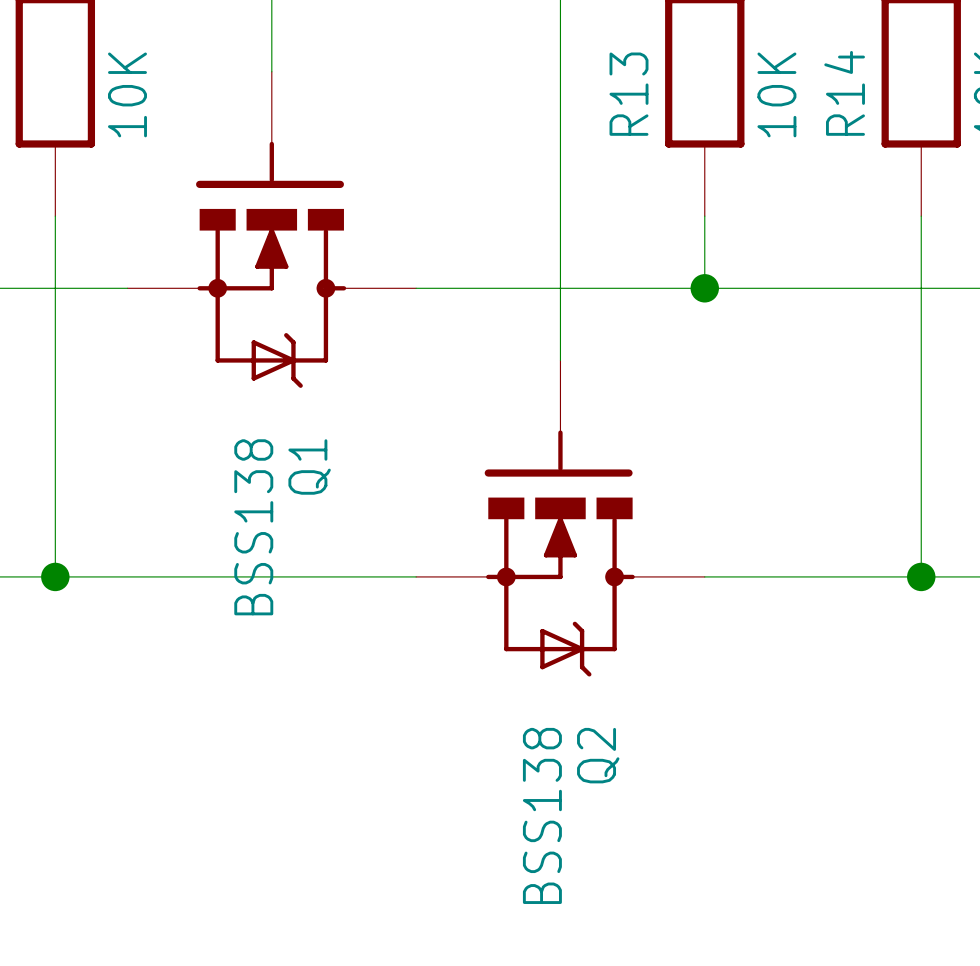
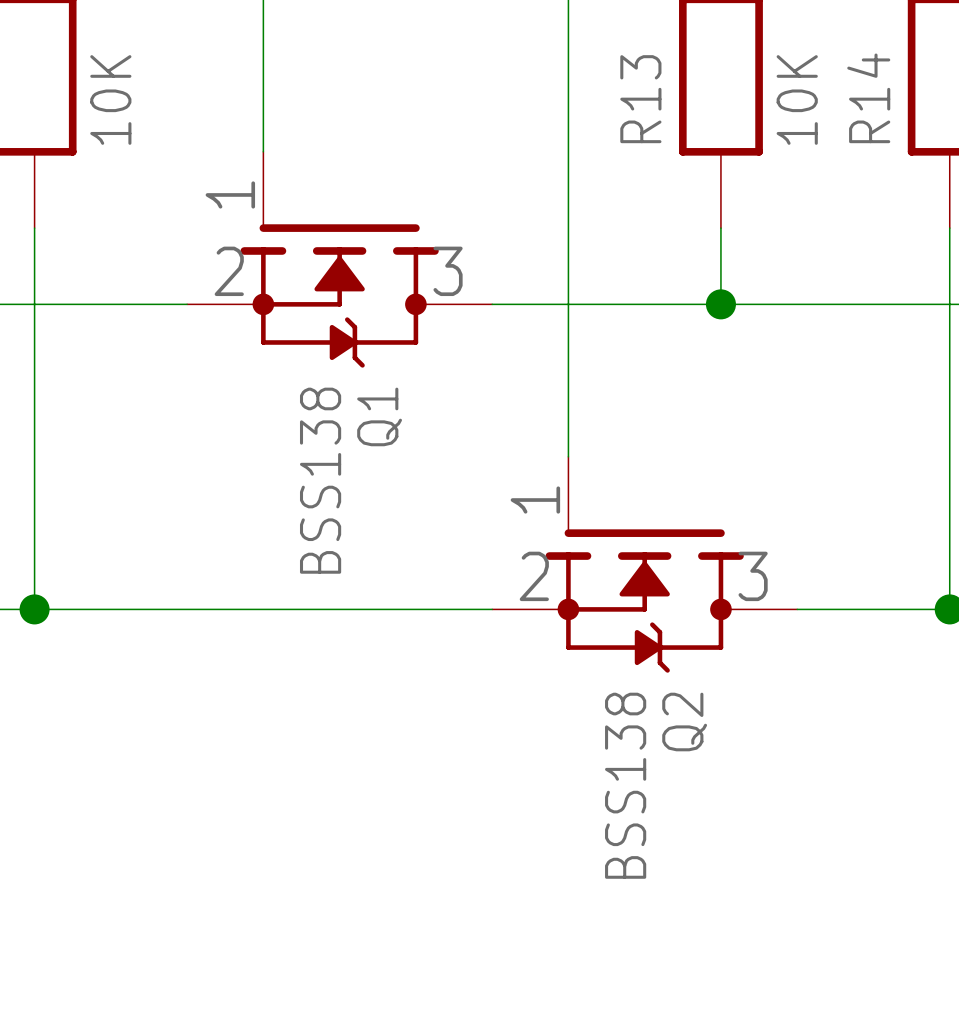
Q1 symbol: [127, 71, 417, 388] -> [187, 151, 493, 368]
Q2 symbol: [416, 360, 705, 677] -> [492, 456, 798, 673]
Q1 name position: Q1 (309, 466) -> Q1 (379, 416)
Q1 value position: BSS138 (253, 527) -> BSS138 (320, 480)
Q2 name position: Q2 (598, 755) -> Q2 (684, 722)
Q2 value position: BSS138 (542, 815) -> BSS138 (625, 785)

